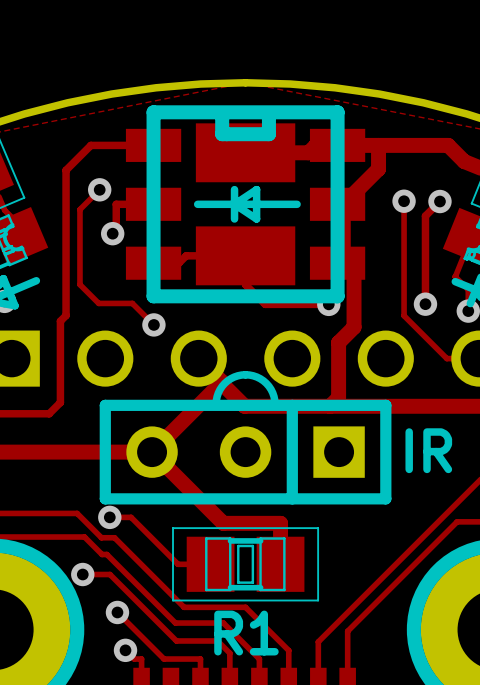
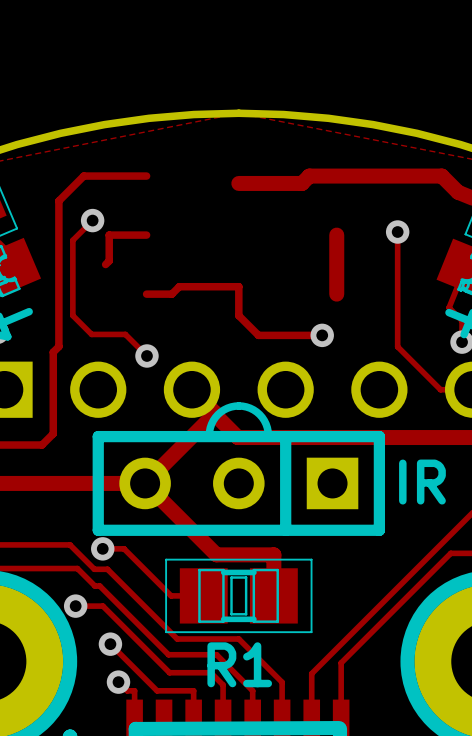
track: (378, 145) (378, 169) (343, 204) (337, 204) -> none
track: (439, 201) (425, 216) (425, 304) -> none
via: (439, 201) -> none
part: (245, 204) -> none
via: (112, 233) -> none
track: (337, 263) (343, 263) (354, 273) (354, 327) (338, 342) (338, 397) (330, 406) -> none
via: (425, 304) -> none

